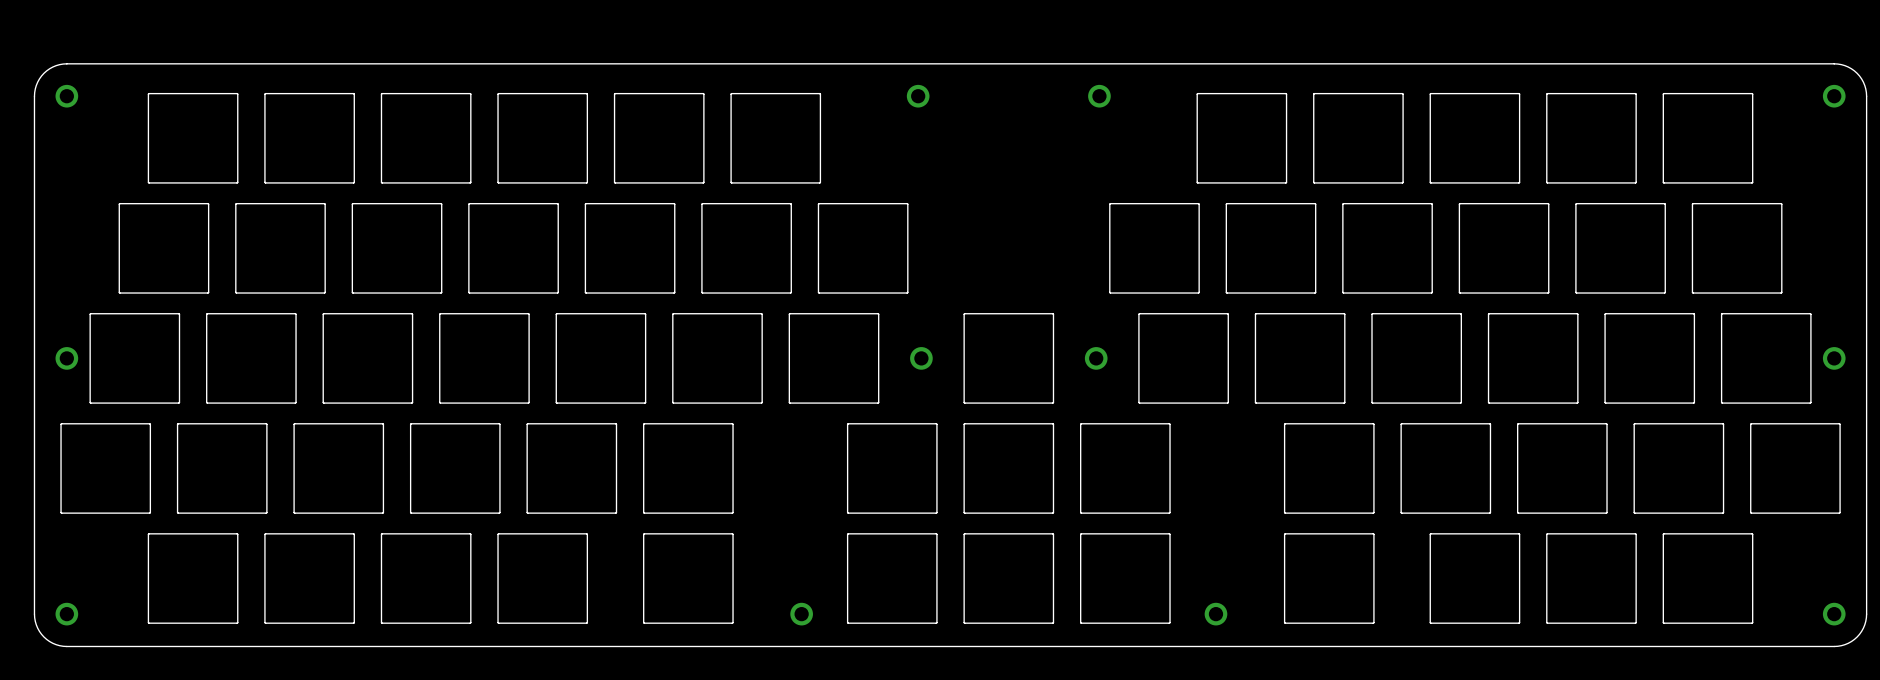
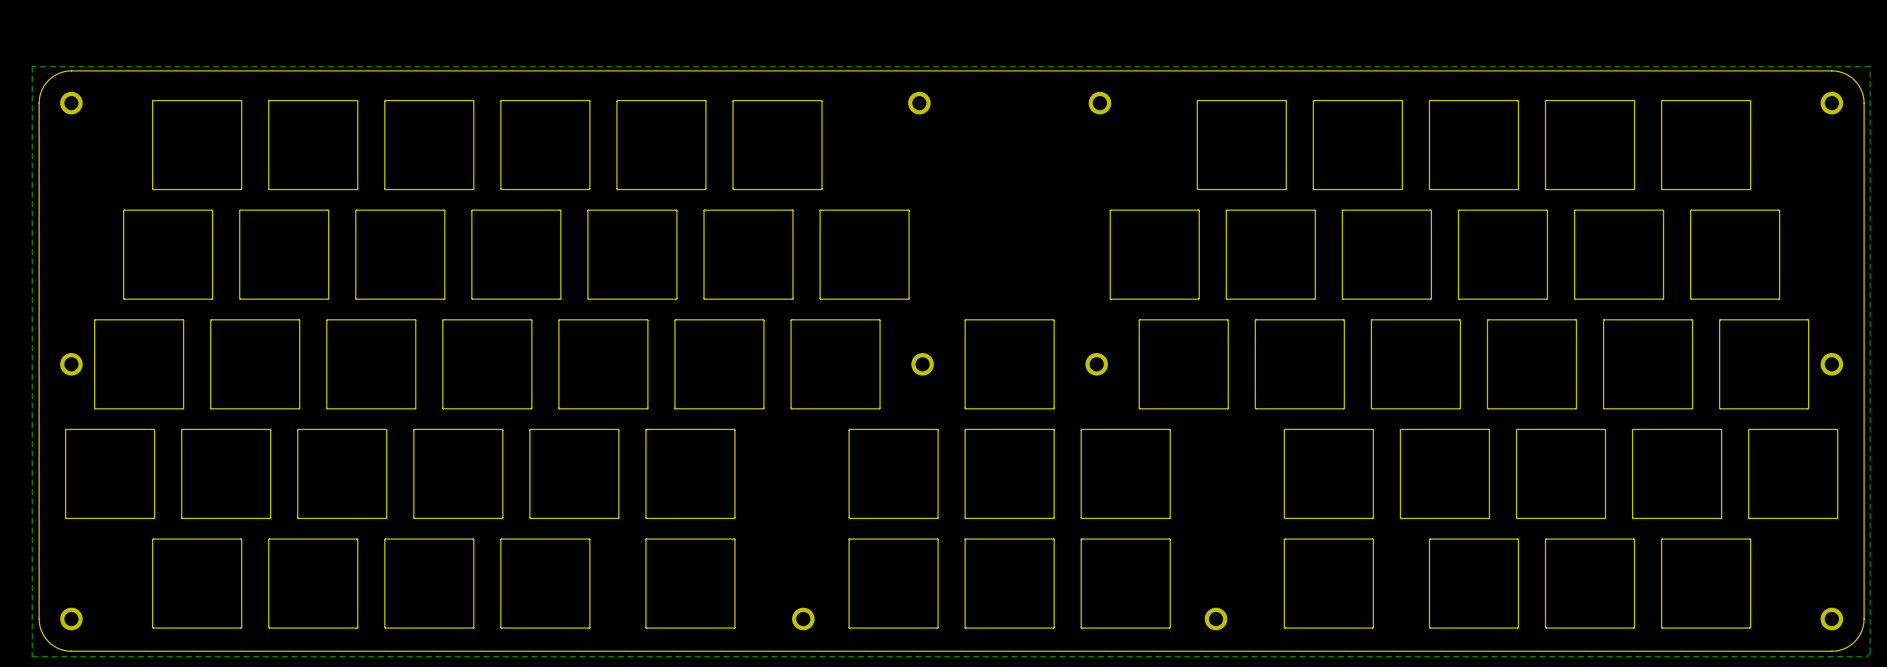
zone outline: none -> (1870, 66) (1870, 653) (1866, 656) (32, 656) (32, 66) (1870, 66)

